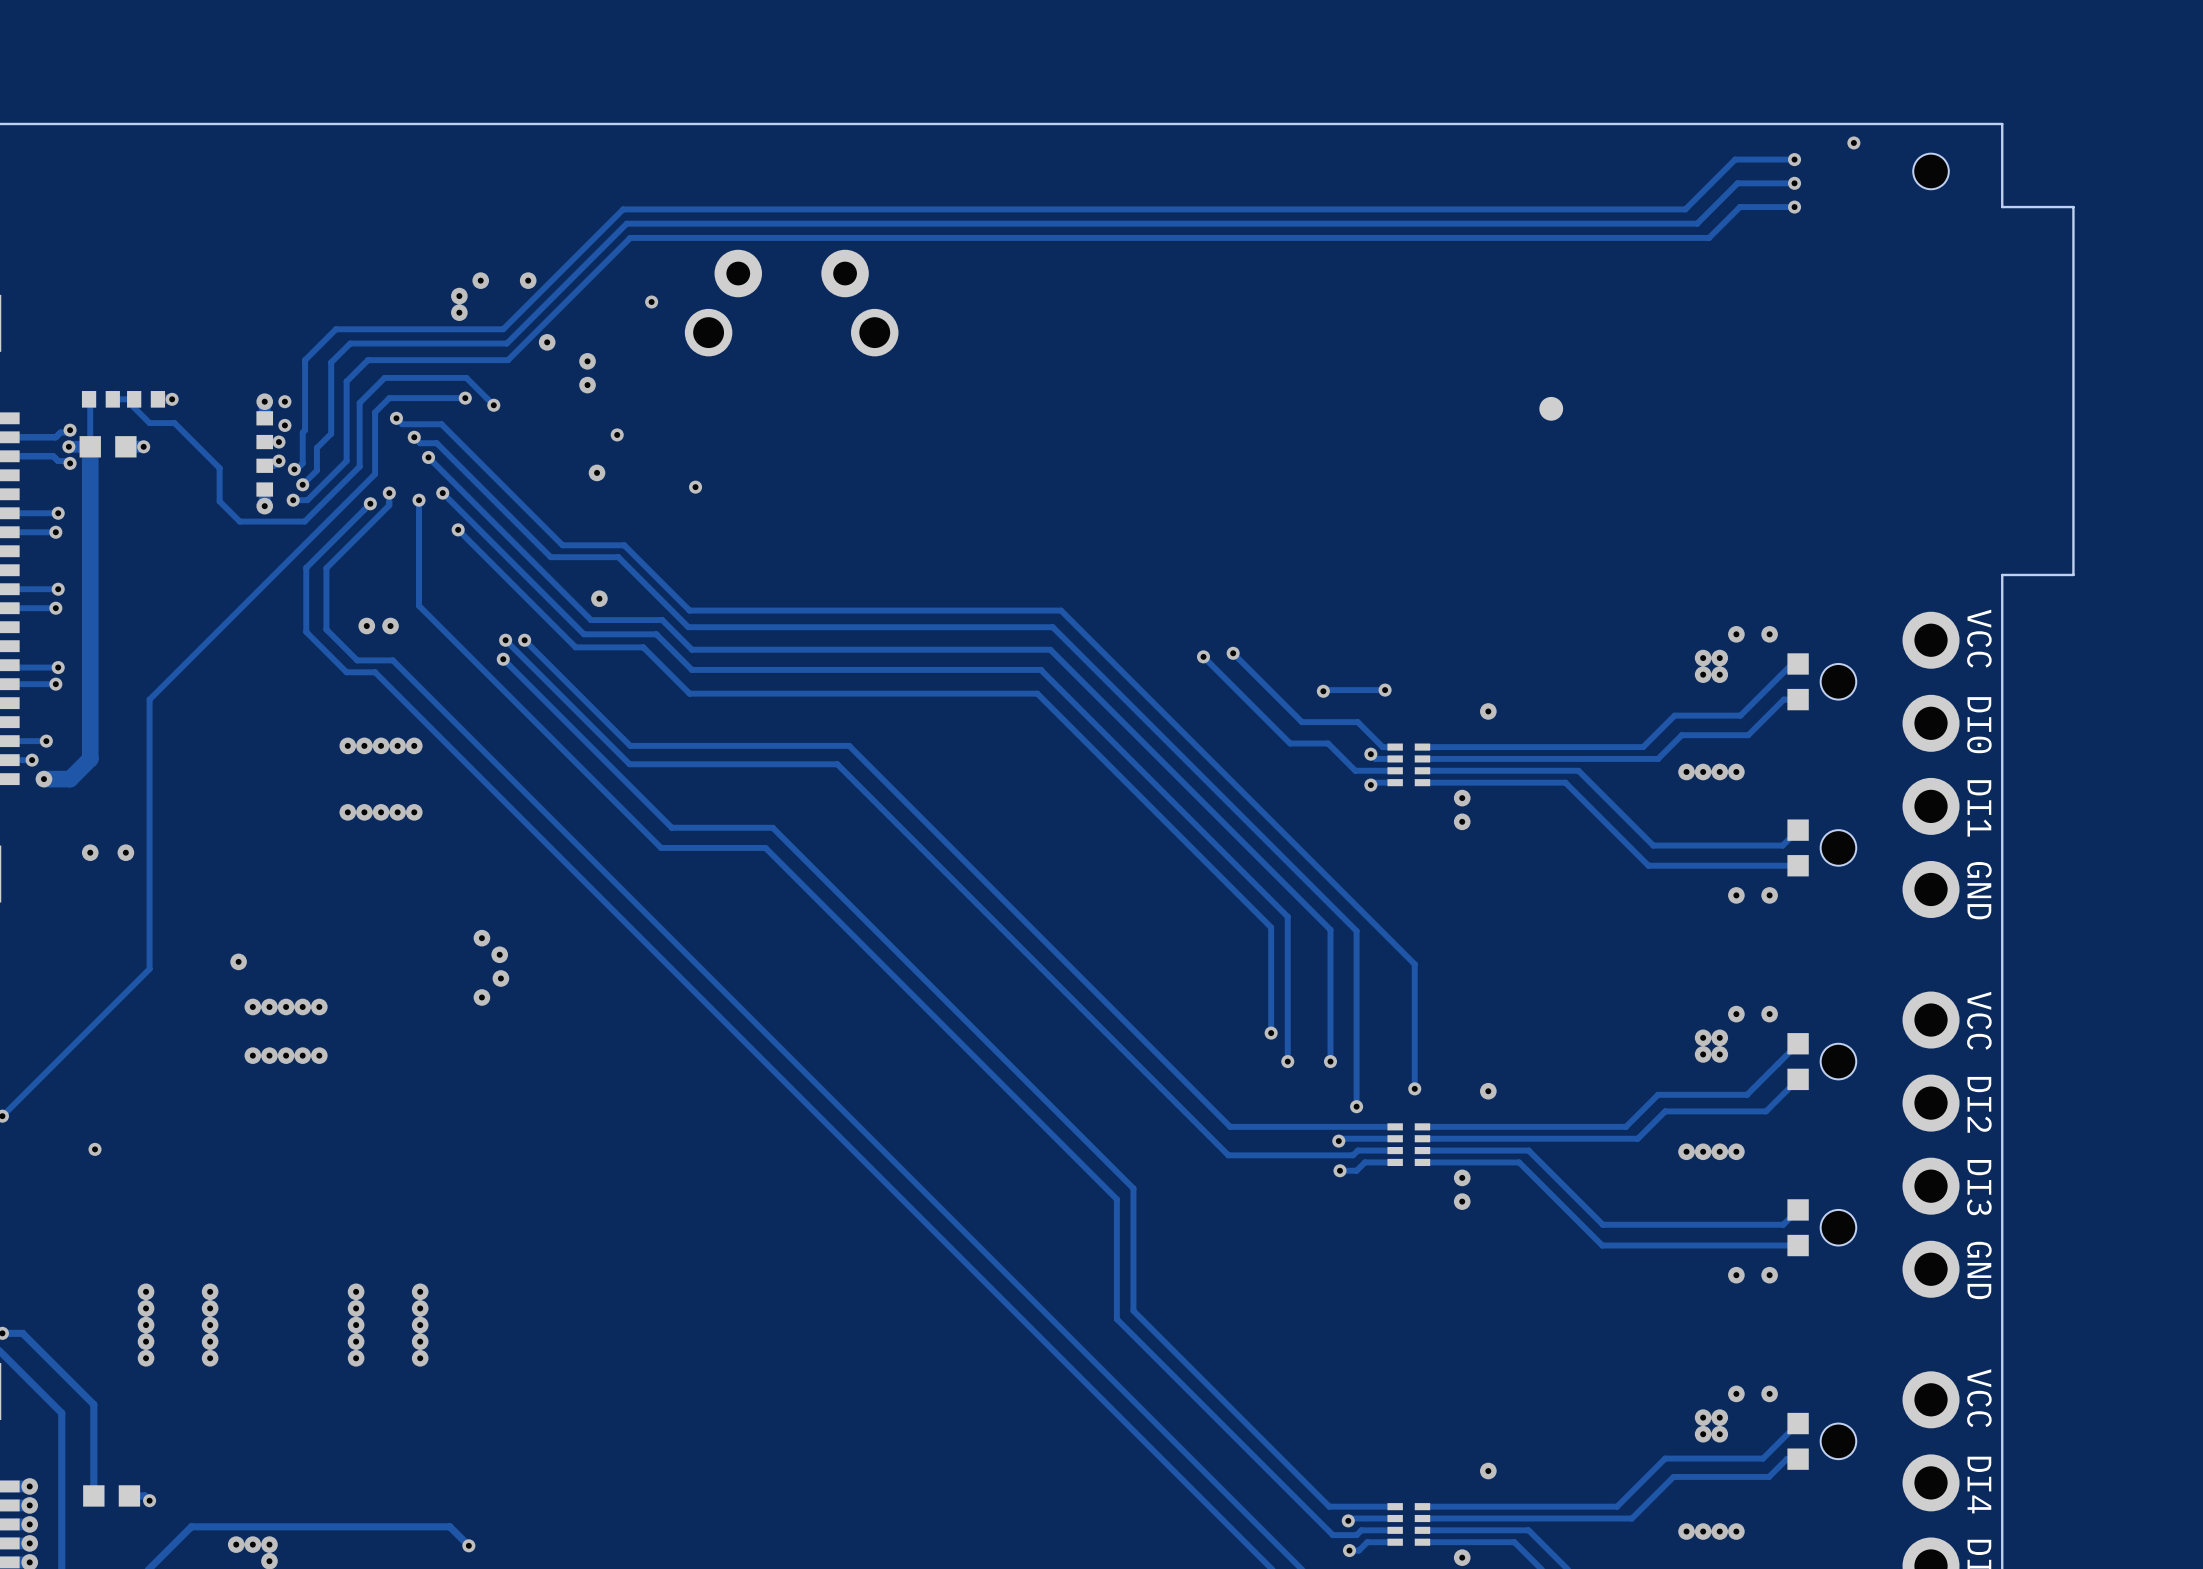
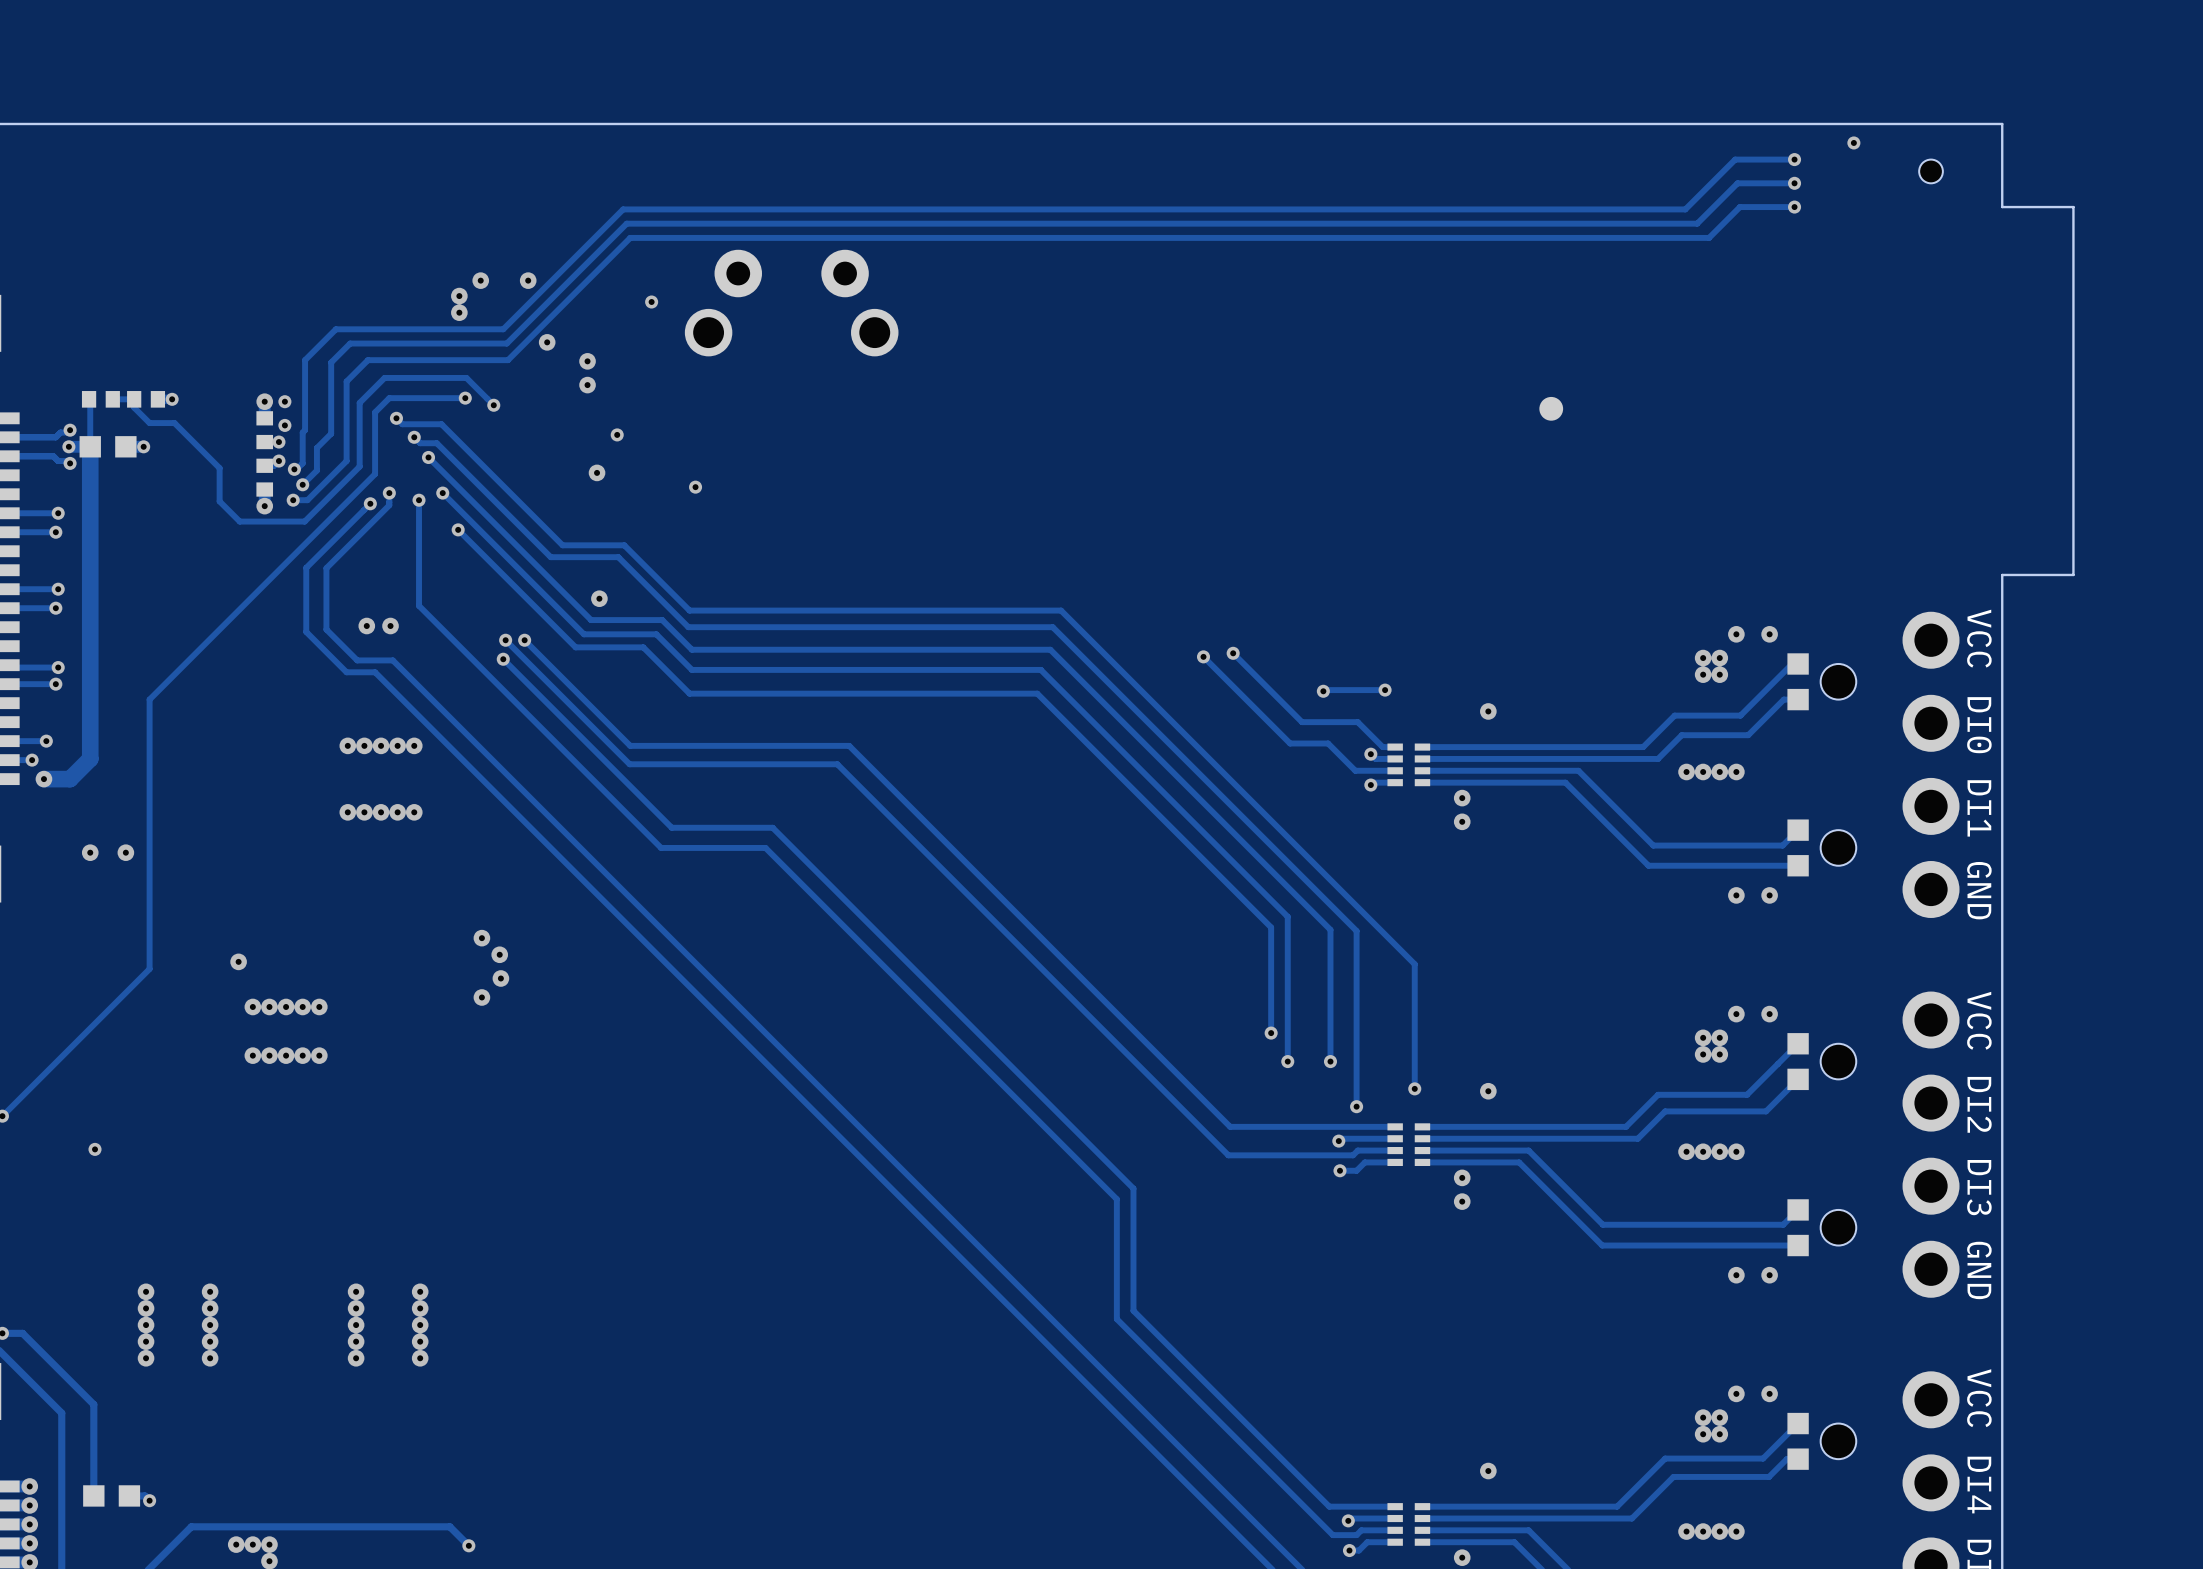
part footprint: [1913, 153, 1949, 190] -> [1919, 159, 1943, 184]

